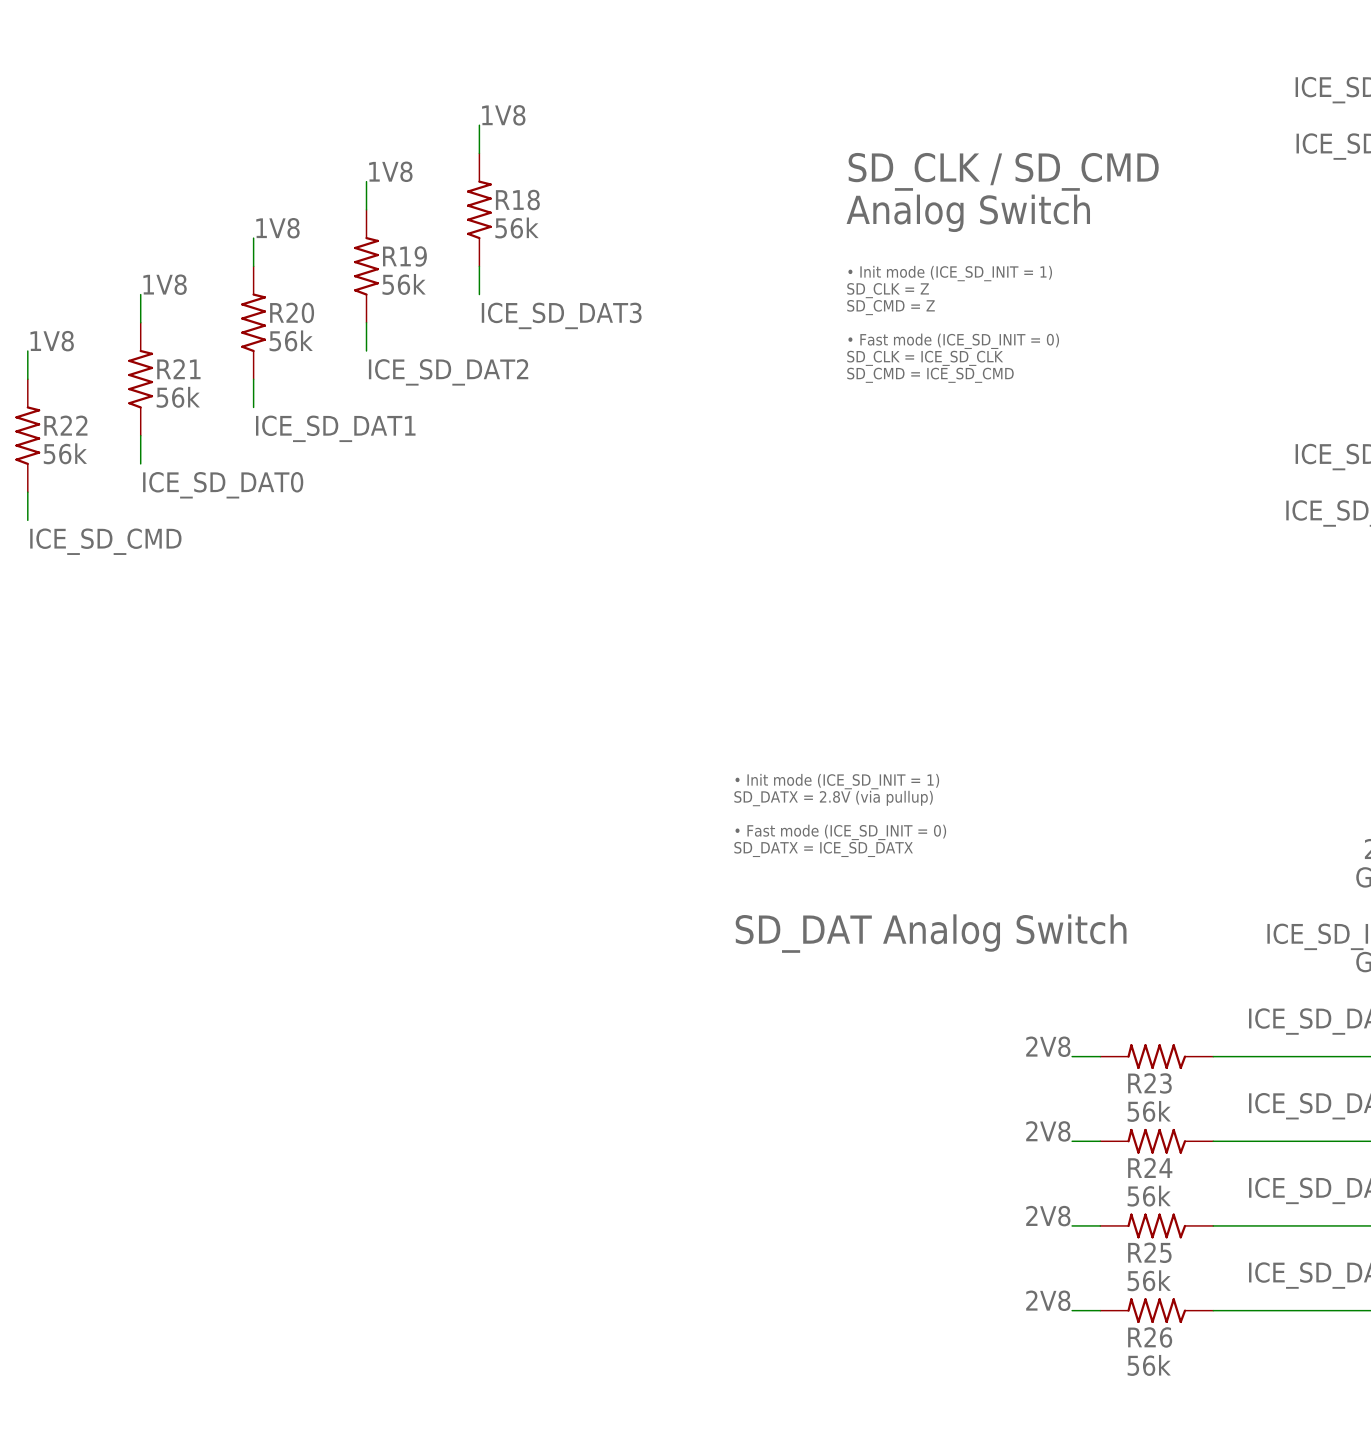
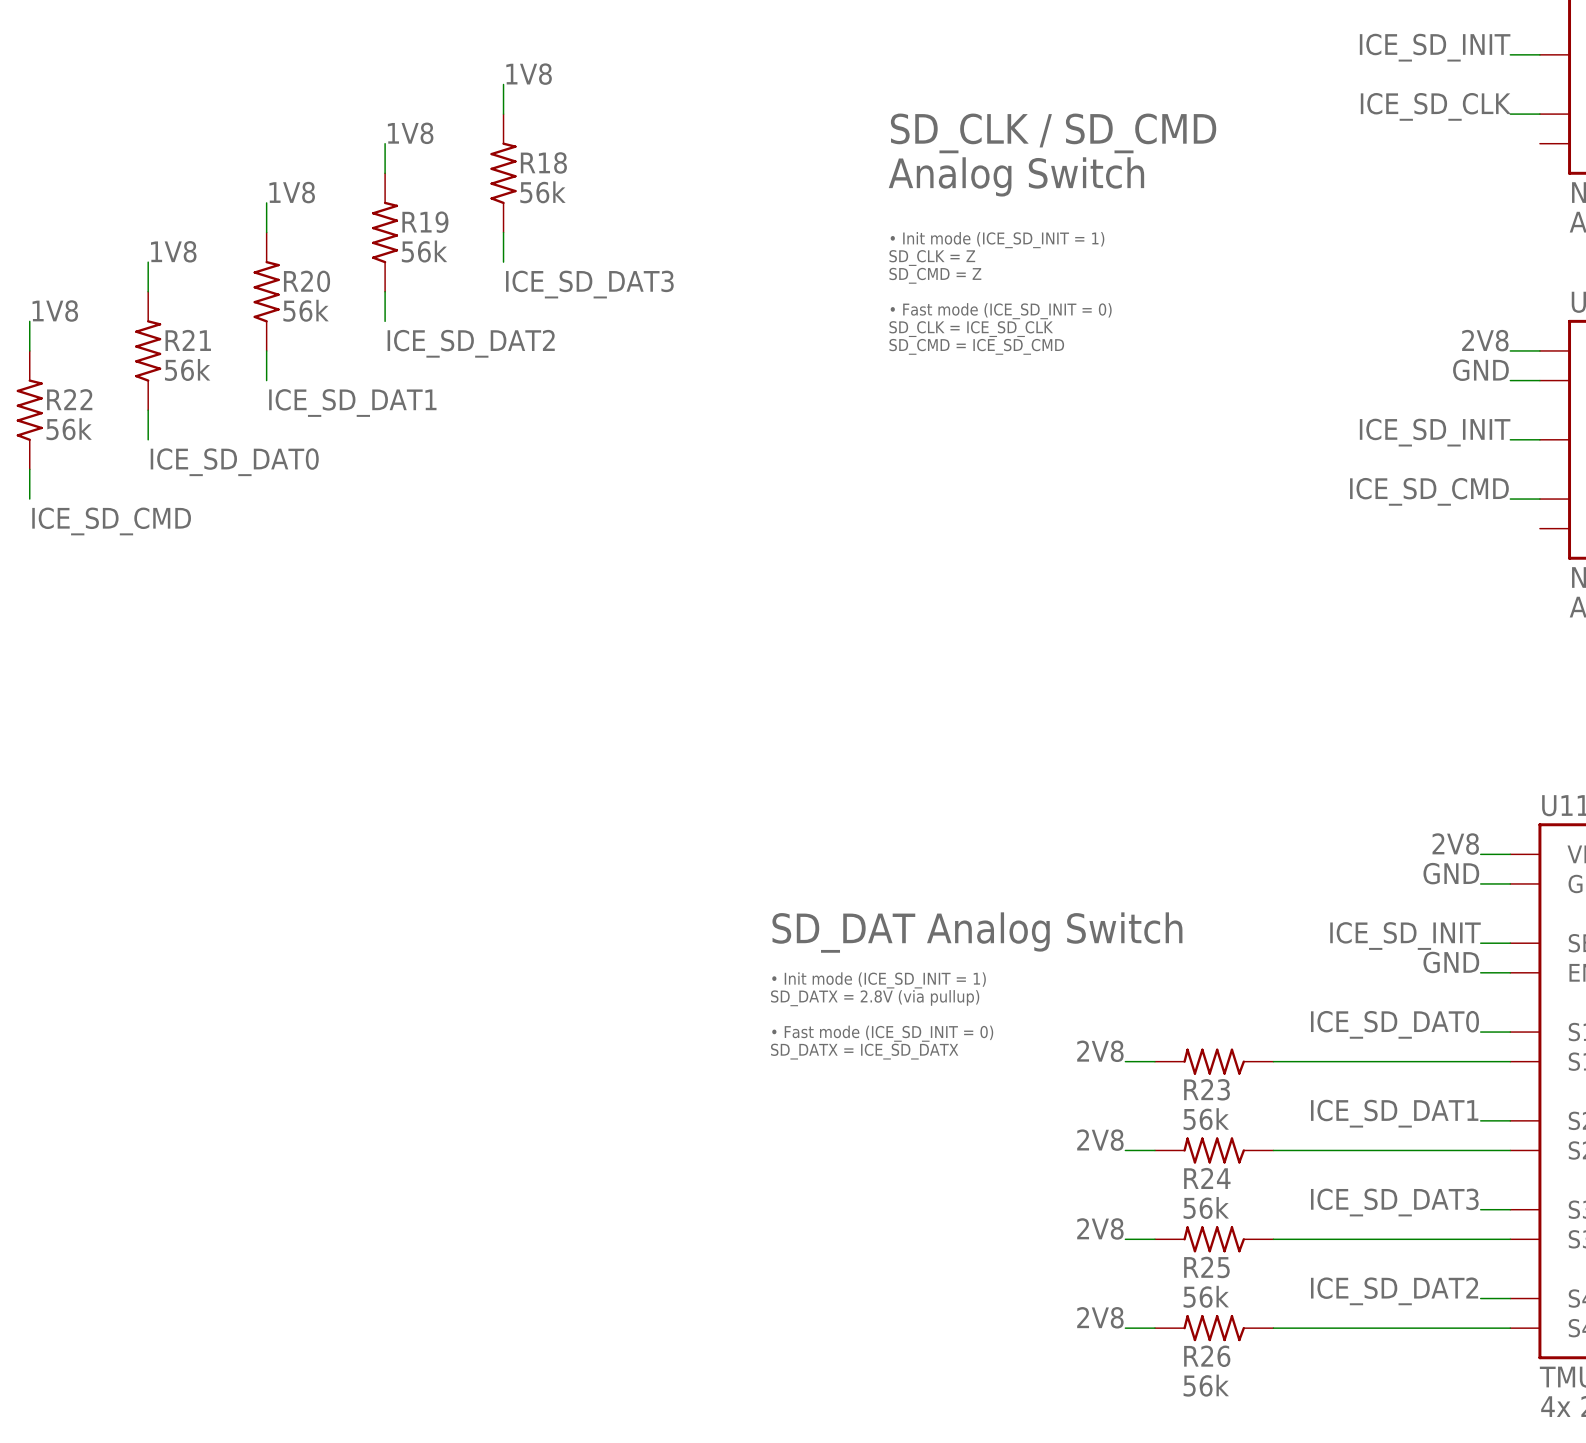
text position: • Init mode (ICE_SD_INIT = 1) (837, 781) -> • Init mode (ICE_SD_INIT = 1) (879, 980)
text position: SD_DATX = 2.8V (via pullup) (833, 798) -> SD_DATX = 2.8V (via pullup) (875, 998)
text position: • Fast mode (ICE_SD_INIT = 0) (840, 832) -> • Fast mode (ICE_SD_INIT = 0) (882, 1033)
text position: SD_DATX = ICE_SD_DATX (823, 849) -> SD_DATX = ICE_SD_DATX (864, 1051)

